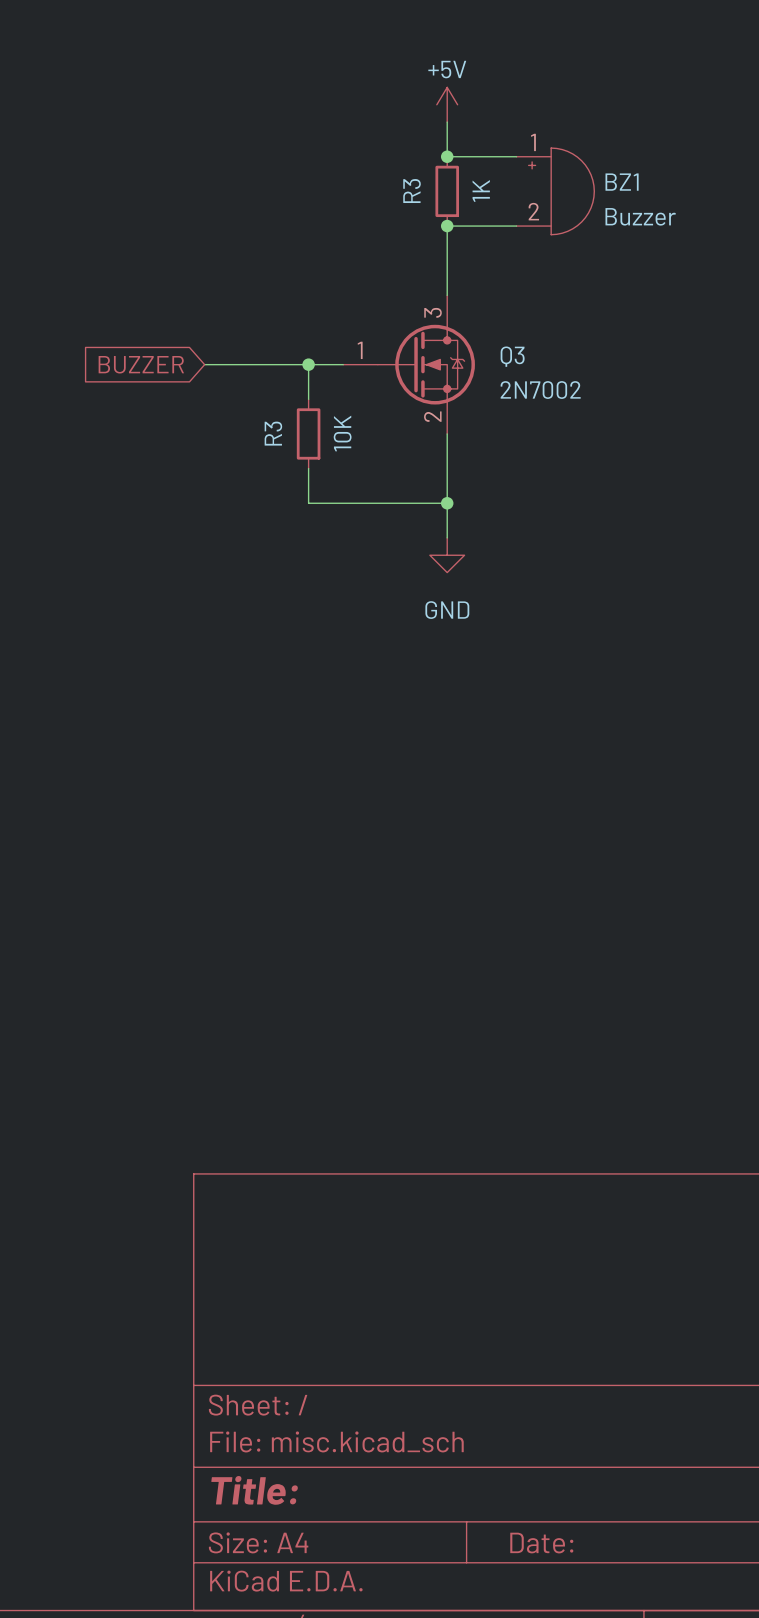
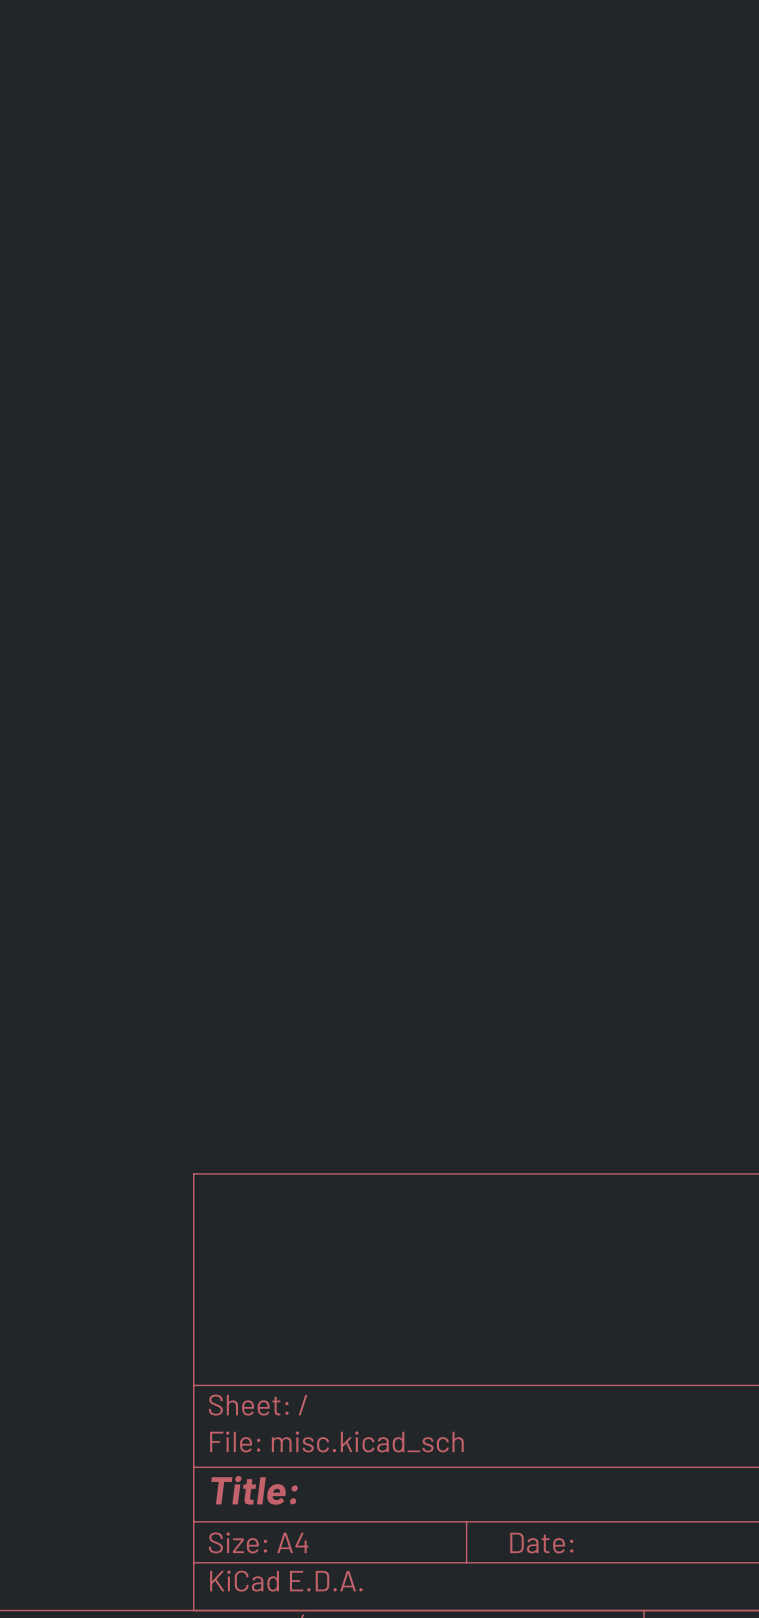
power symbol: +5V (447, 104) -> none
wire: (447, 122) (447, 156) (516, 156) -> none
junction: (447, 156) -> none
R3: 1K (447, 191) -> none
BZ1: Buzzer (555, 191) -> none
junction: (447, 226) -> none
wire: (516, 226) (447, 226) (447, 295) -> none
global label: BUZZER (141, 364) -> none
wire: (204, 364) (343, 364) -> none
wire: (308, 364) (308, 399) -> none
junction: (308, 364) -> none
Q3: 2N7002 (409, 364) -> none
R3: 10K (308, 433) -> none
wire: (447, 433) (447, 537) -> none
wire: (308, 468) (308, 503) (447, 503) -> none
junction: (447, 503) -> none
power symbol: GND (447, 555) -> none

